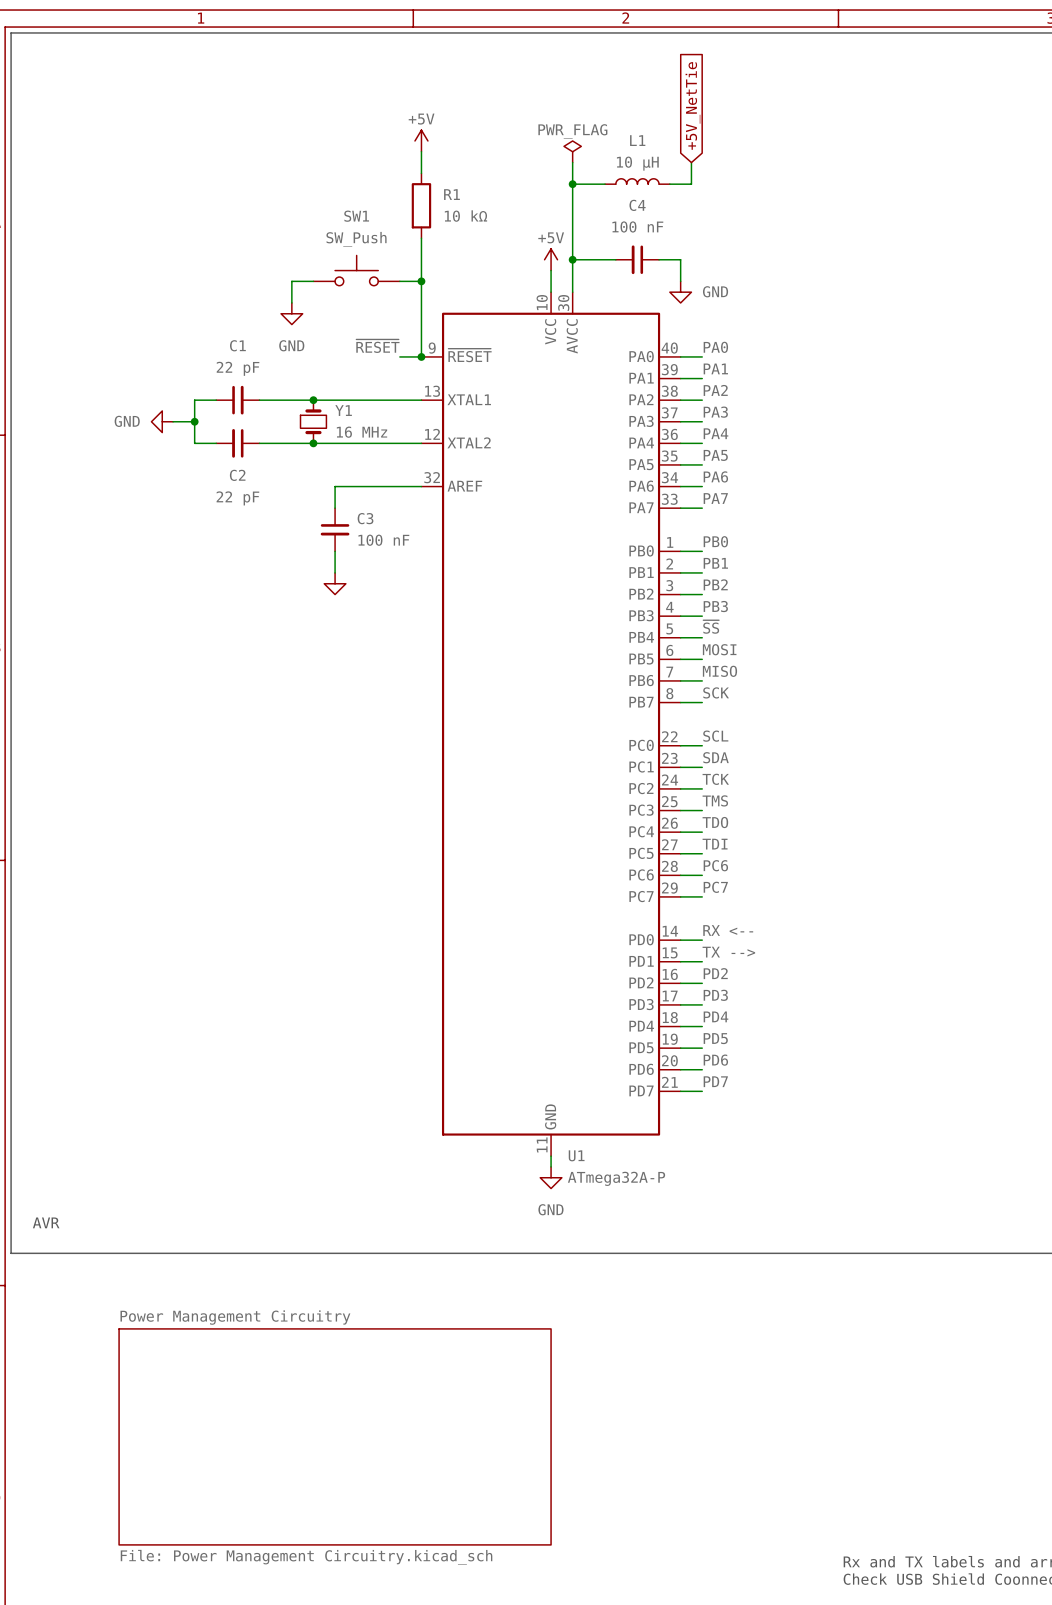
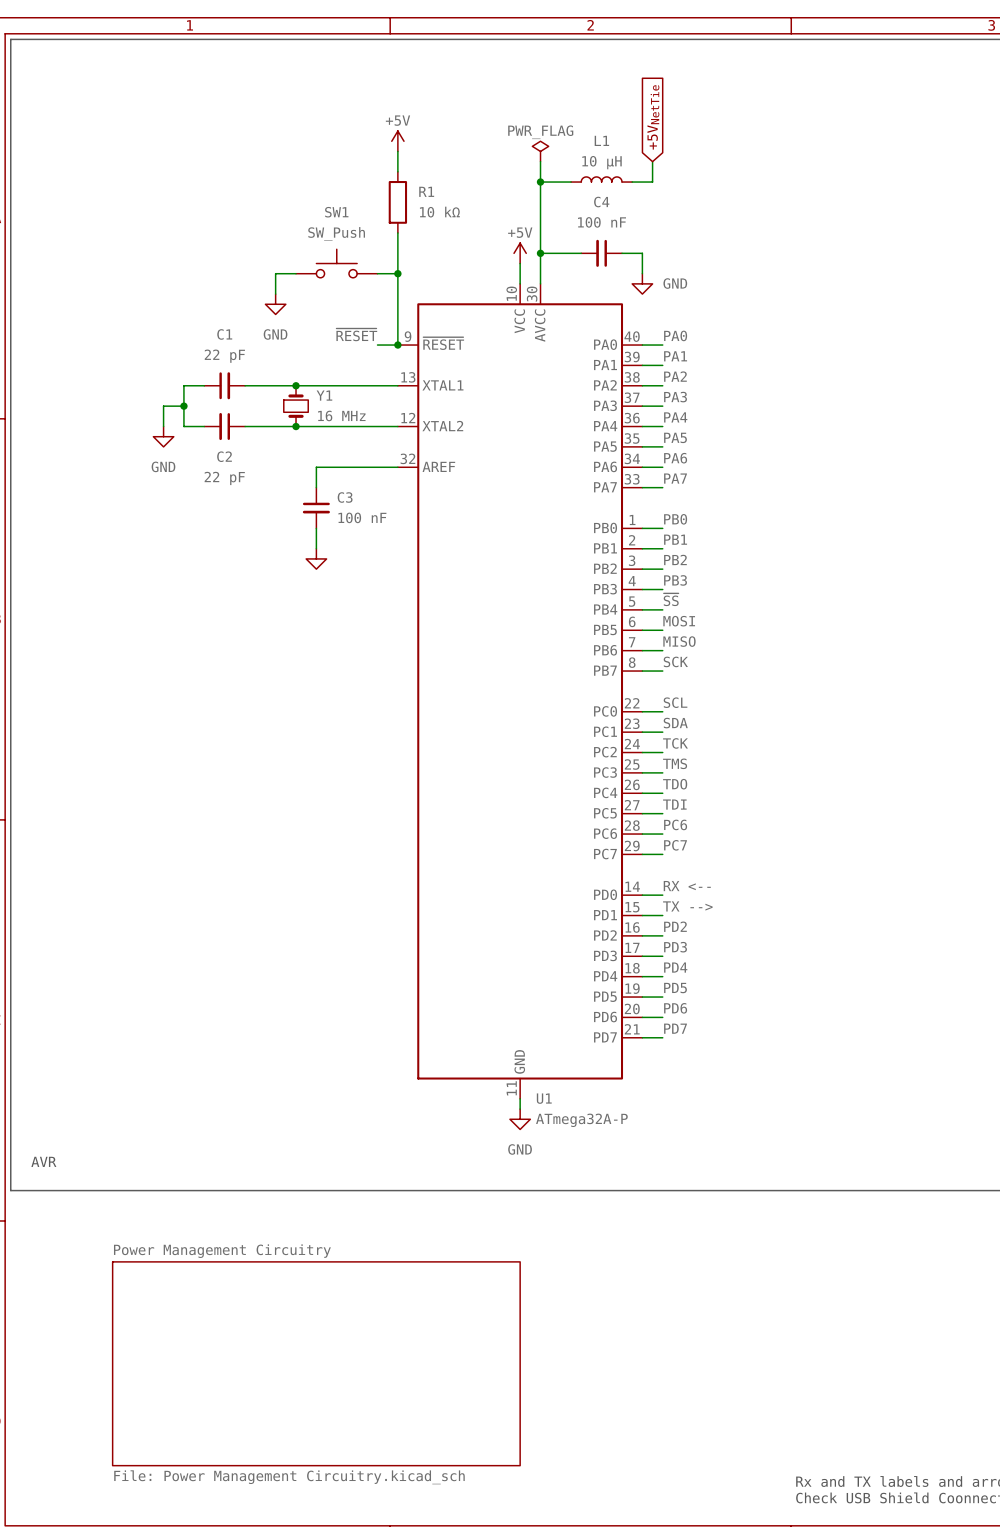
global label: +5V_NetTie (692, 105) -> +5VNetTie (653, 117)
power symbol rotation: 0° (162, 421) -> 90° counterclockwise (163, 436)
power symbol position: GND (162, 421) -> GND (163, 436)
wire: none -> (163, 406) (163, 426)

